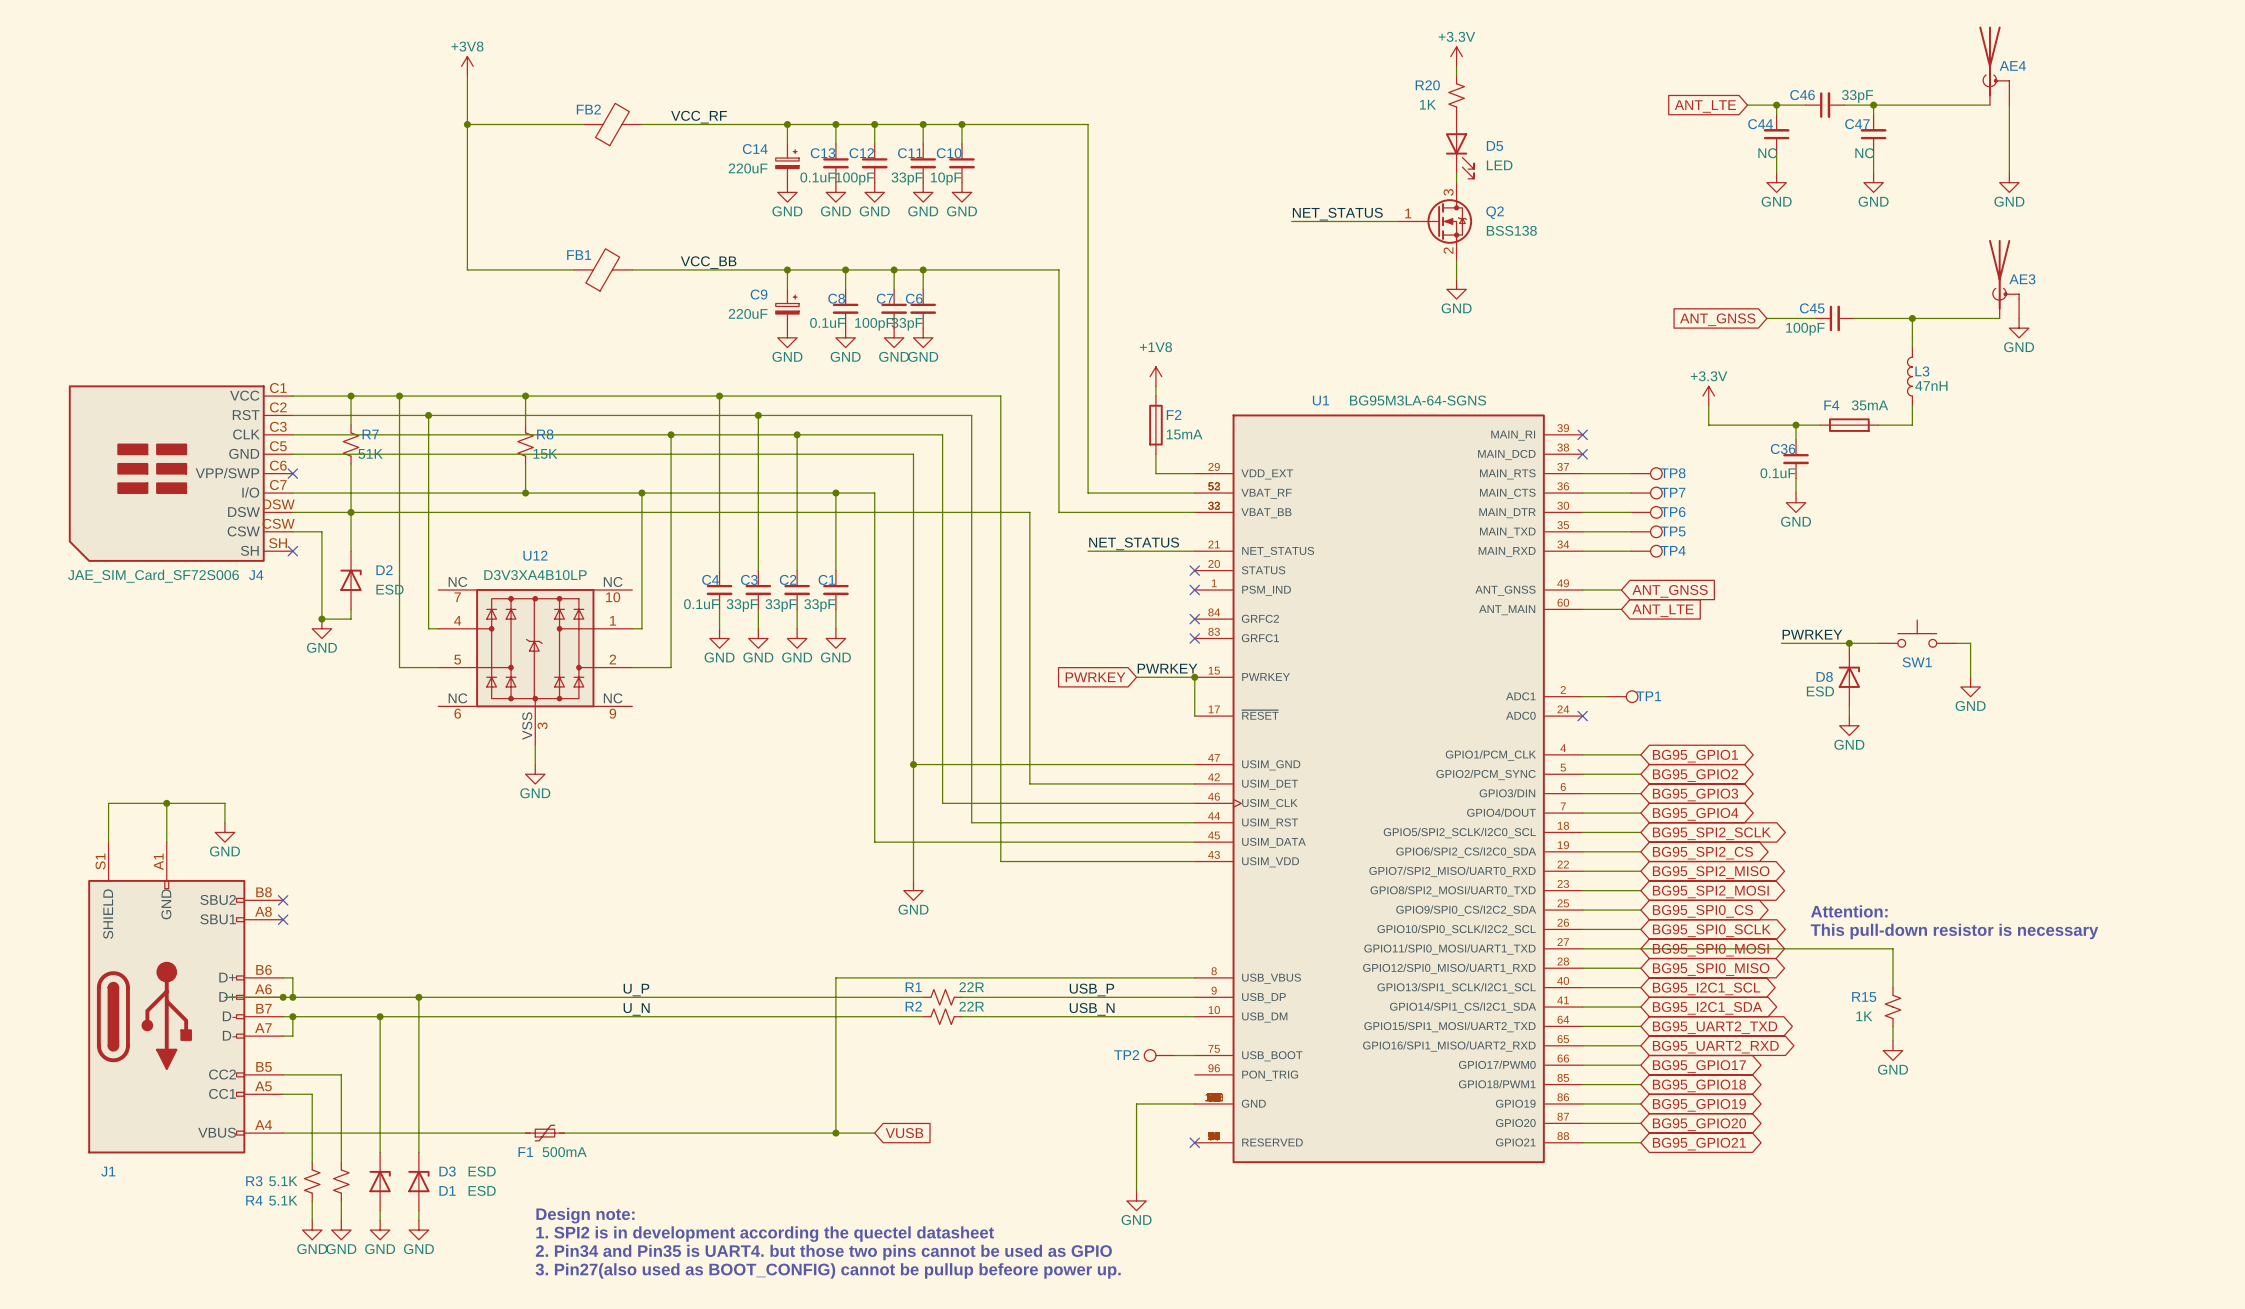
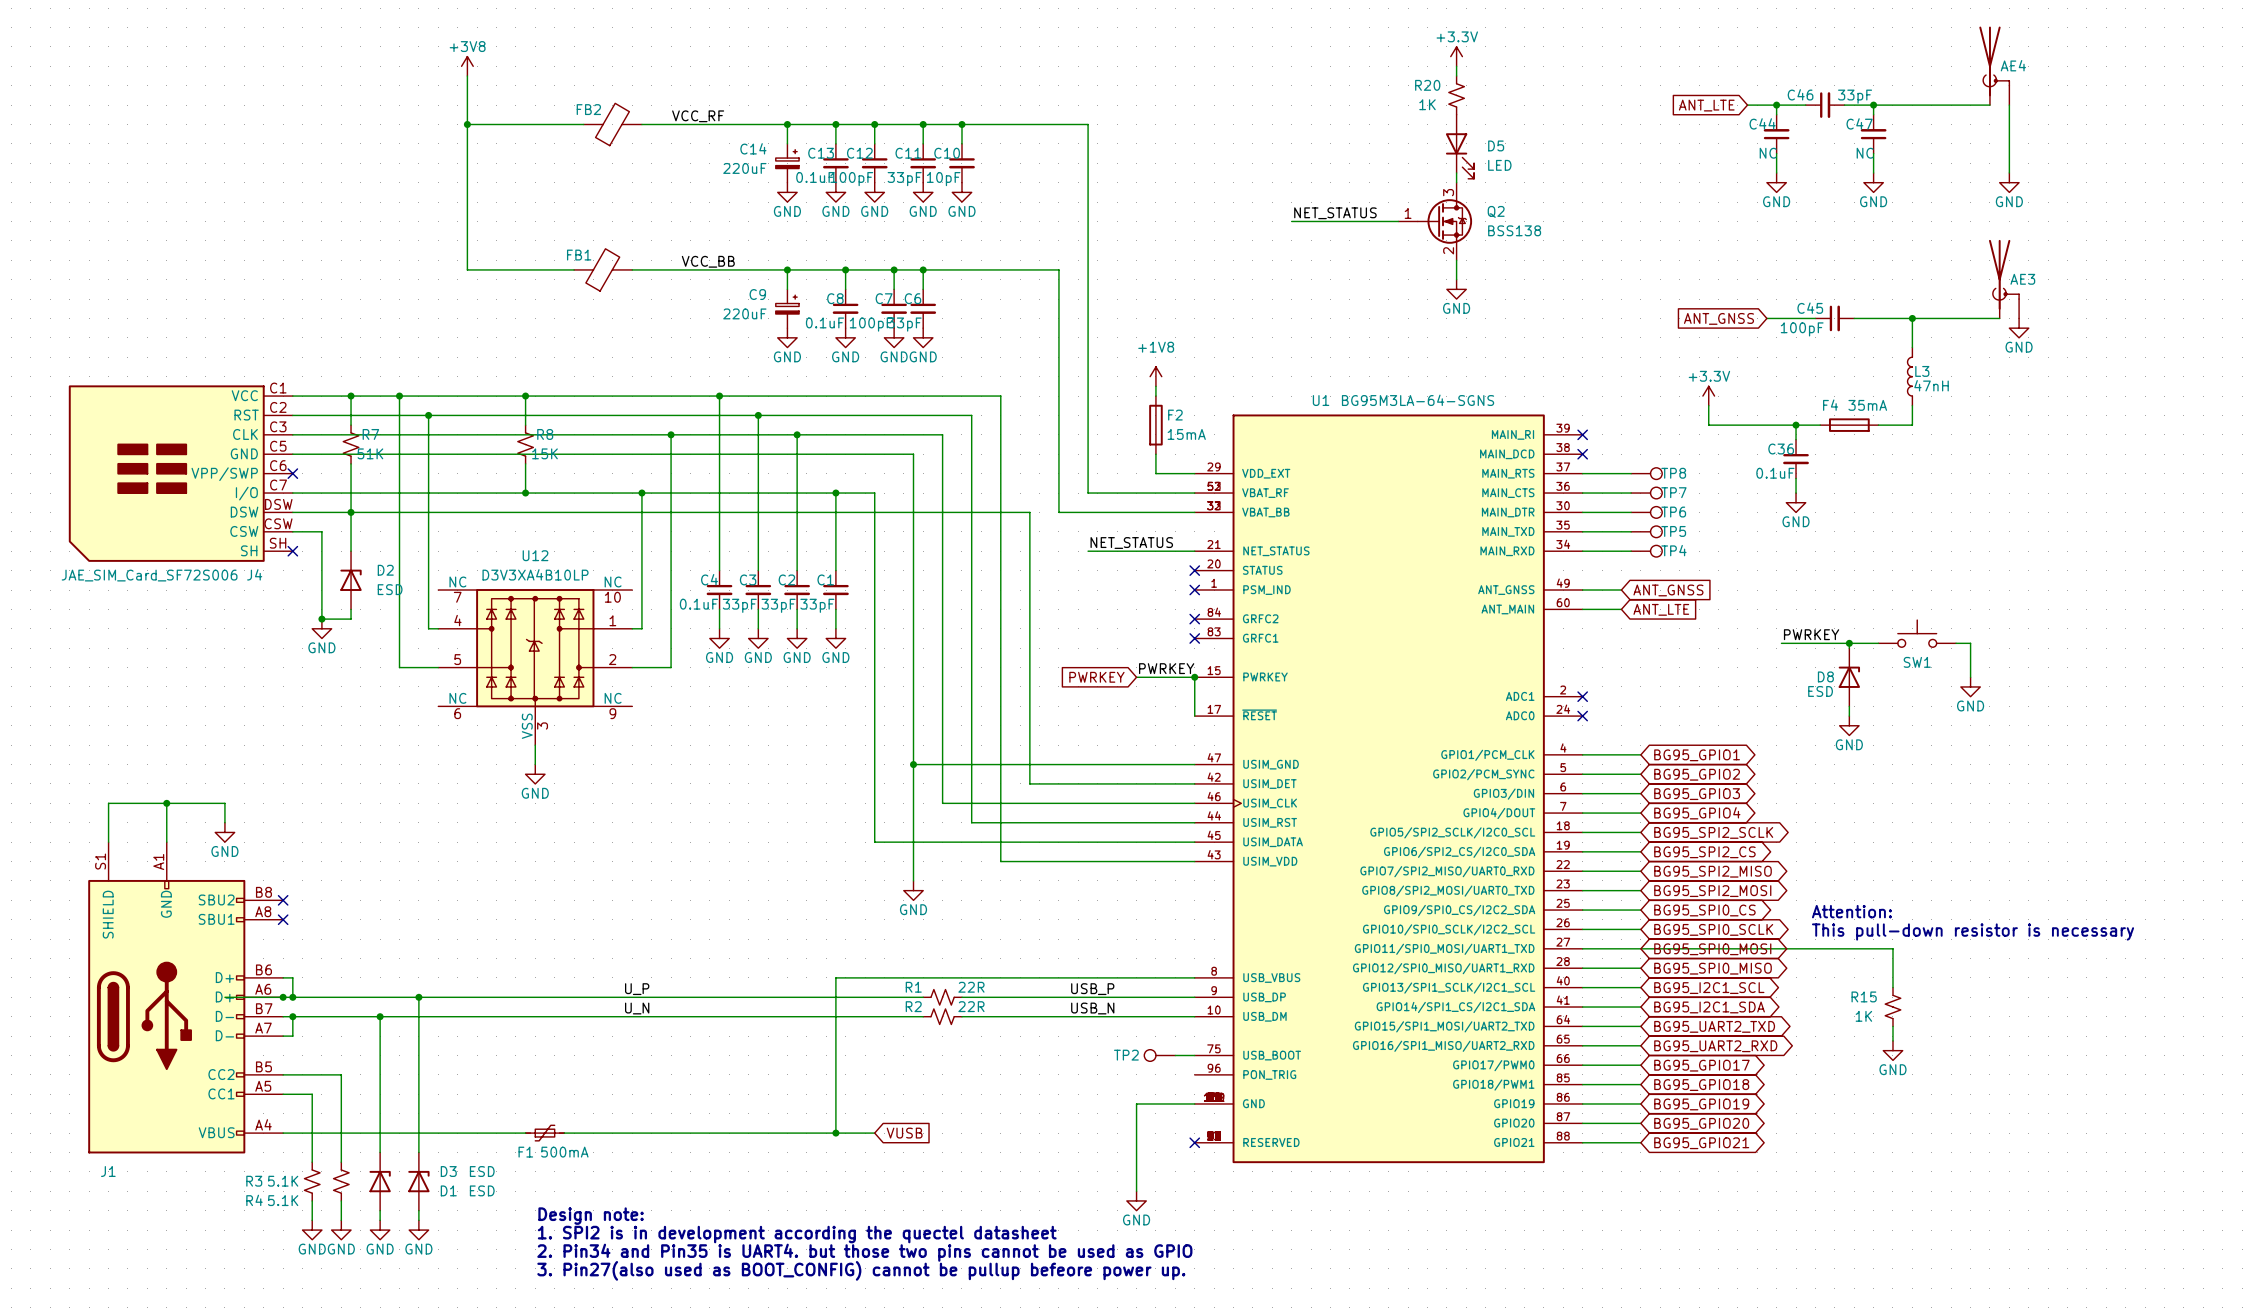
wire: (1582, 696) (1606, 696) -> none
no-connect mark: none -> (1582, 696)
TP1: (1622, 696) -> none

